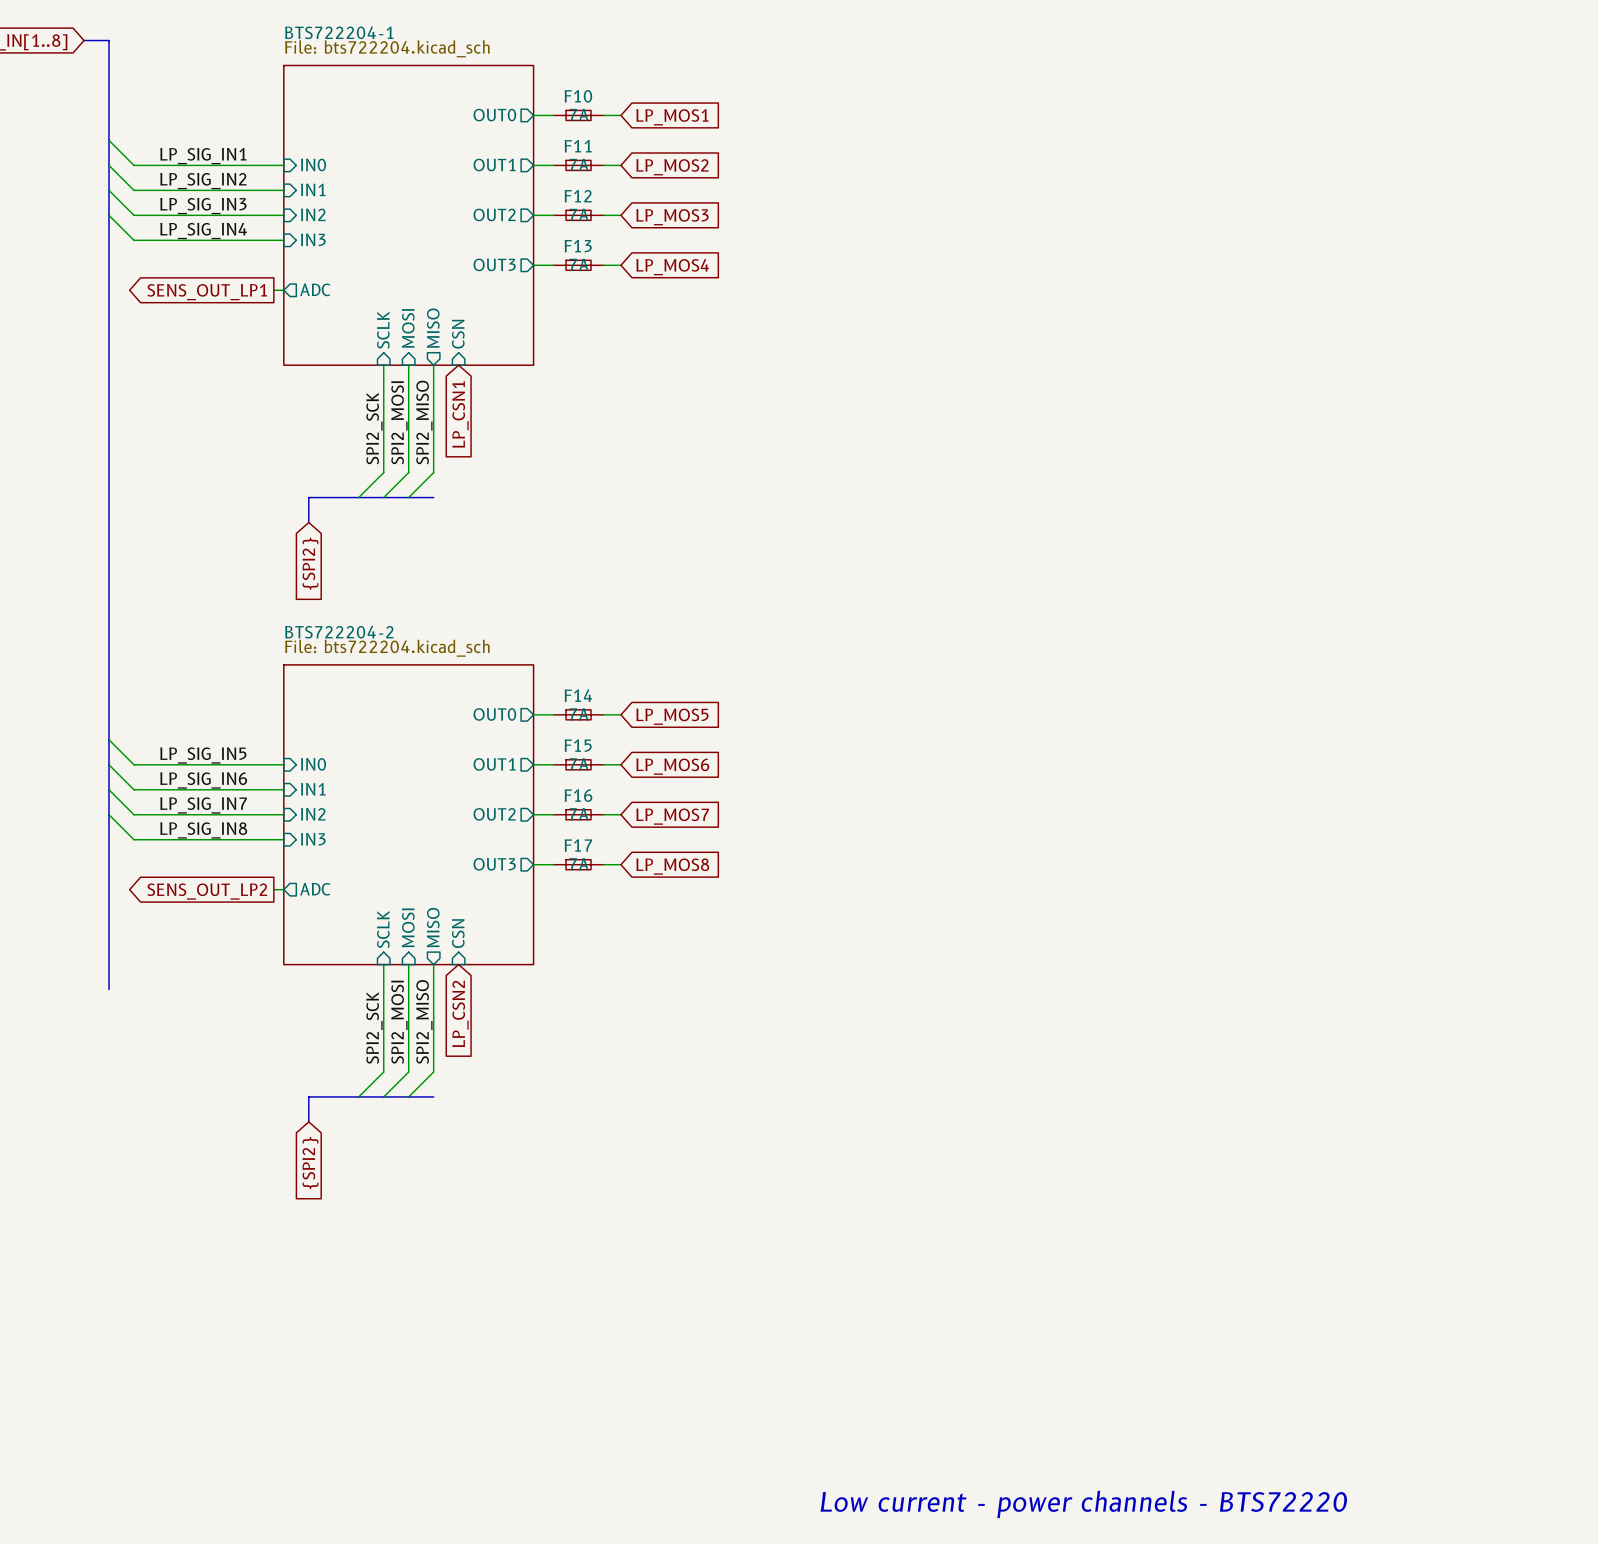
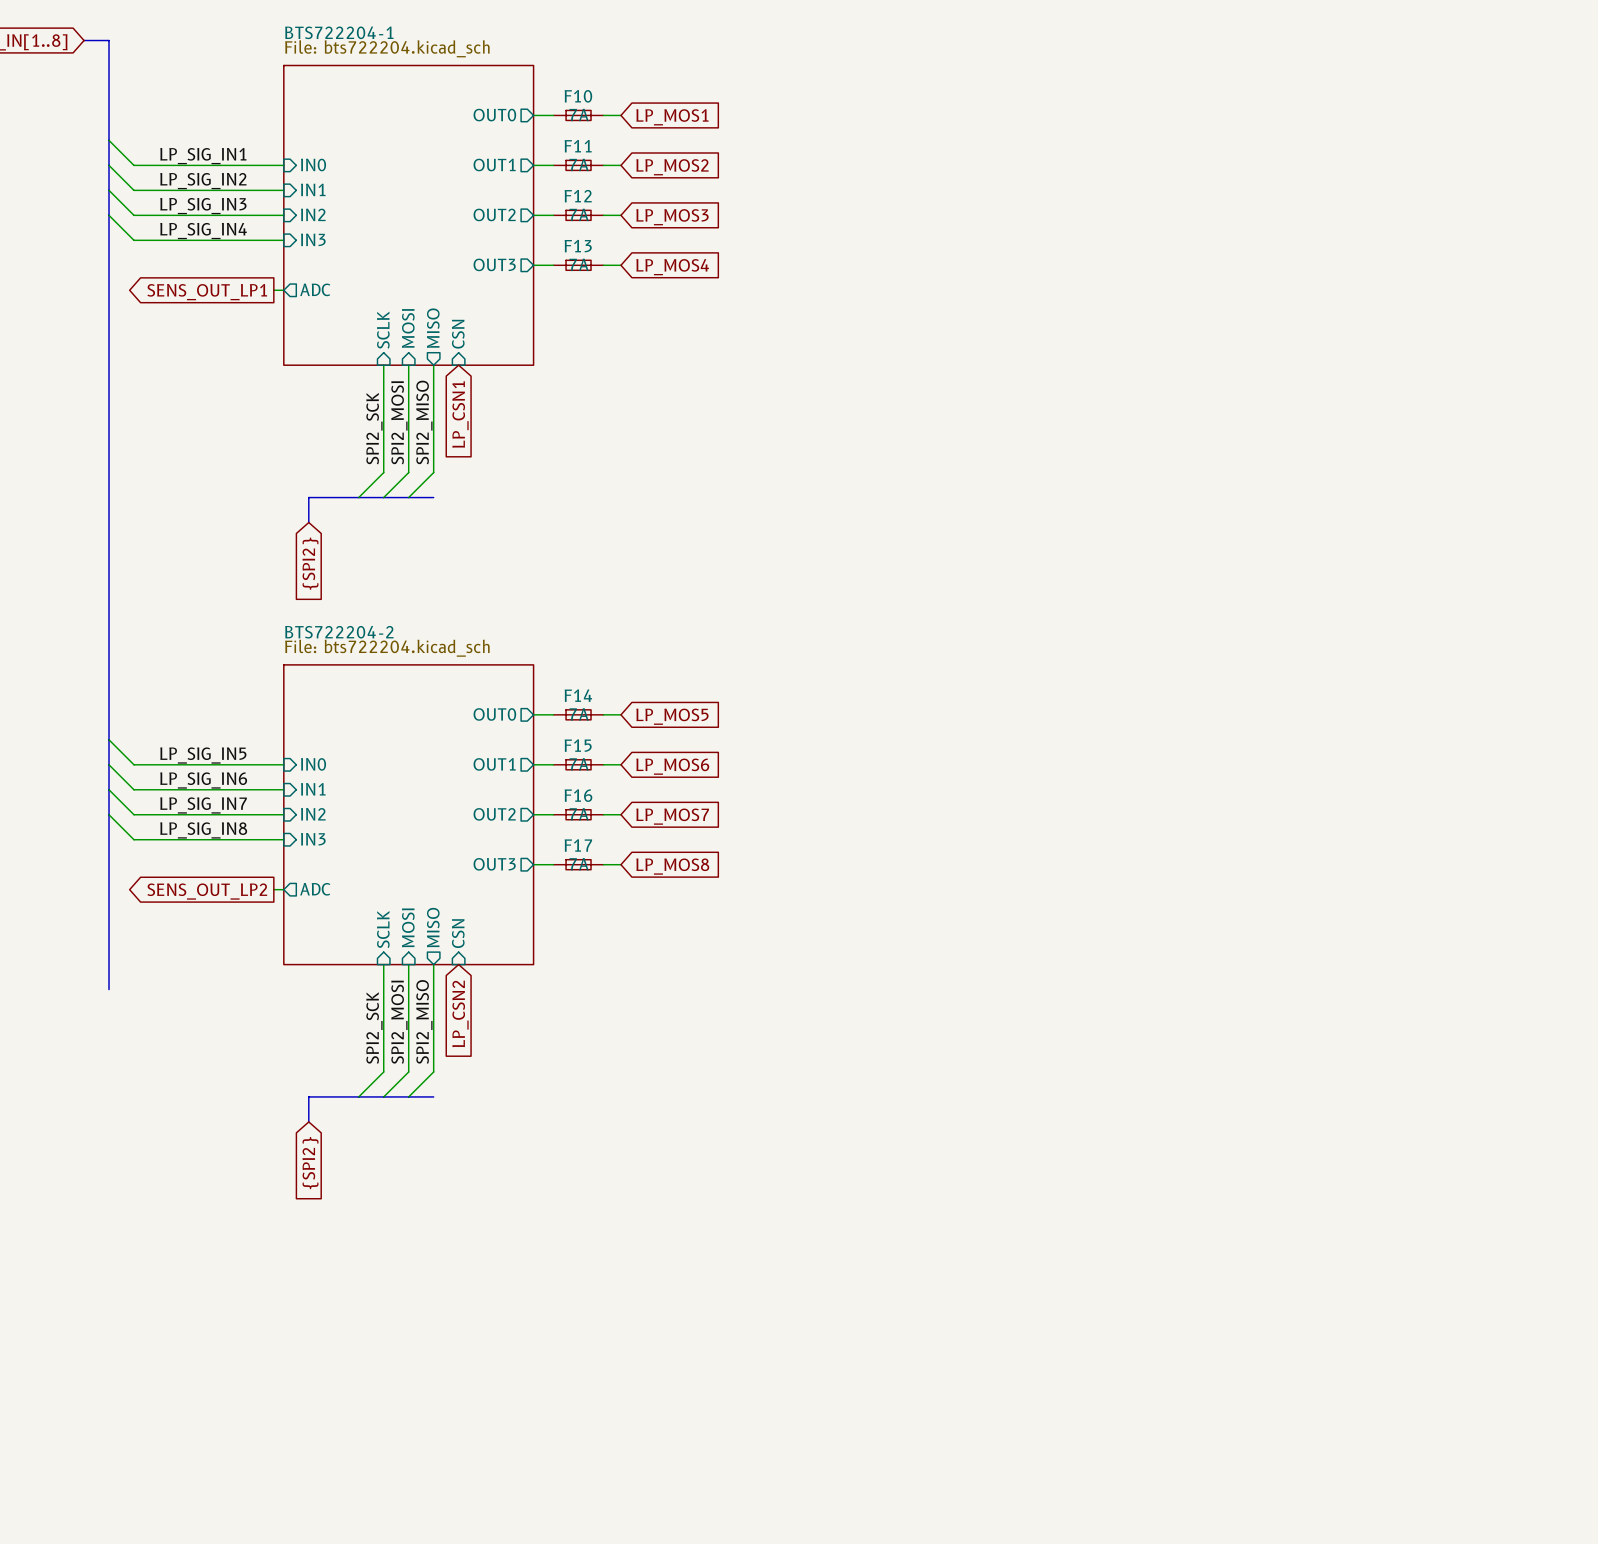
text: Low current - power channels - BTS72220 (1083, 1504) -> none

